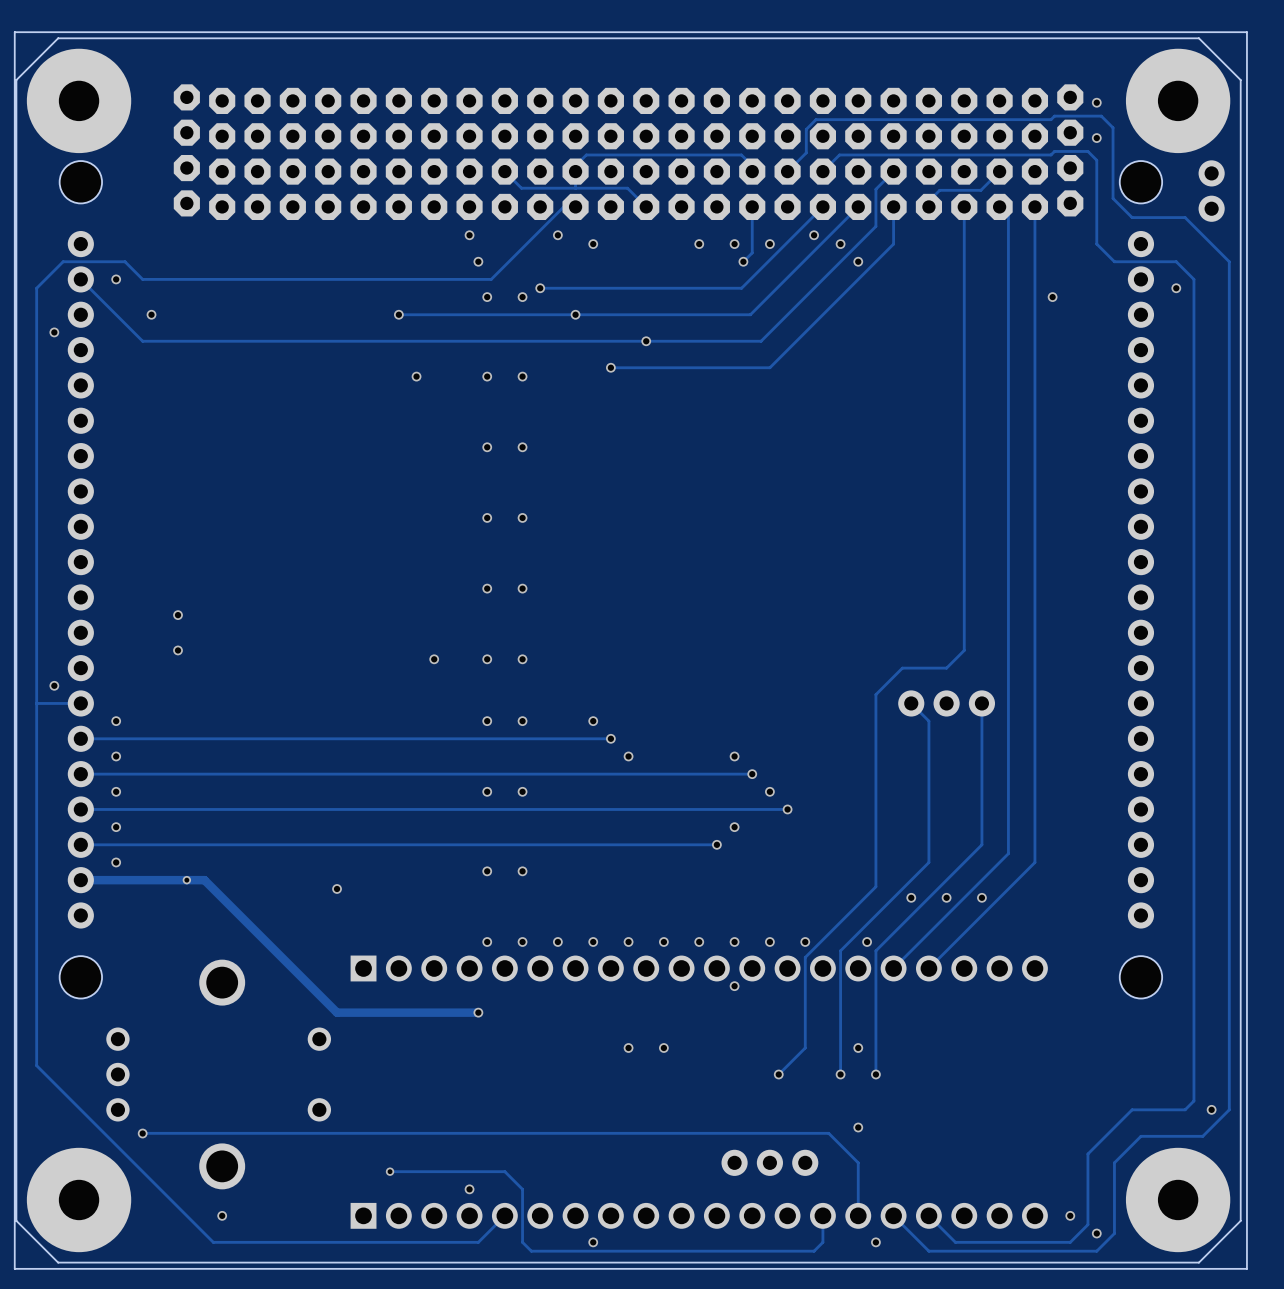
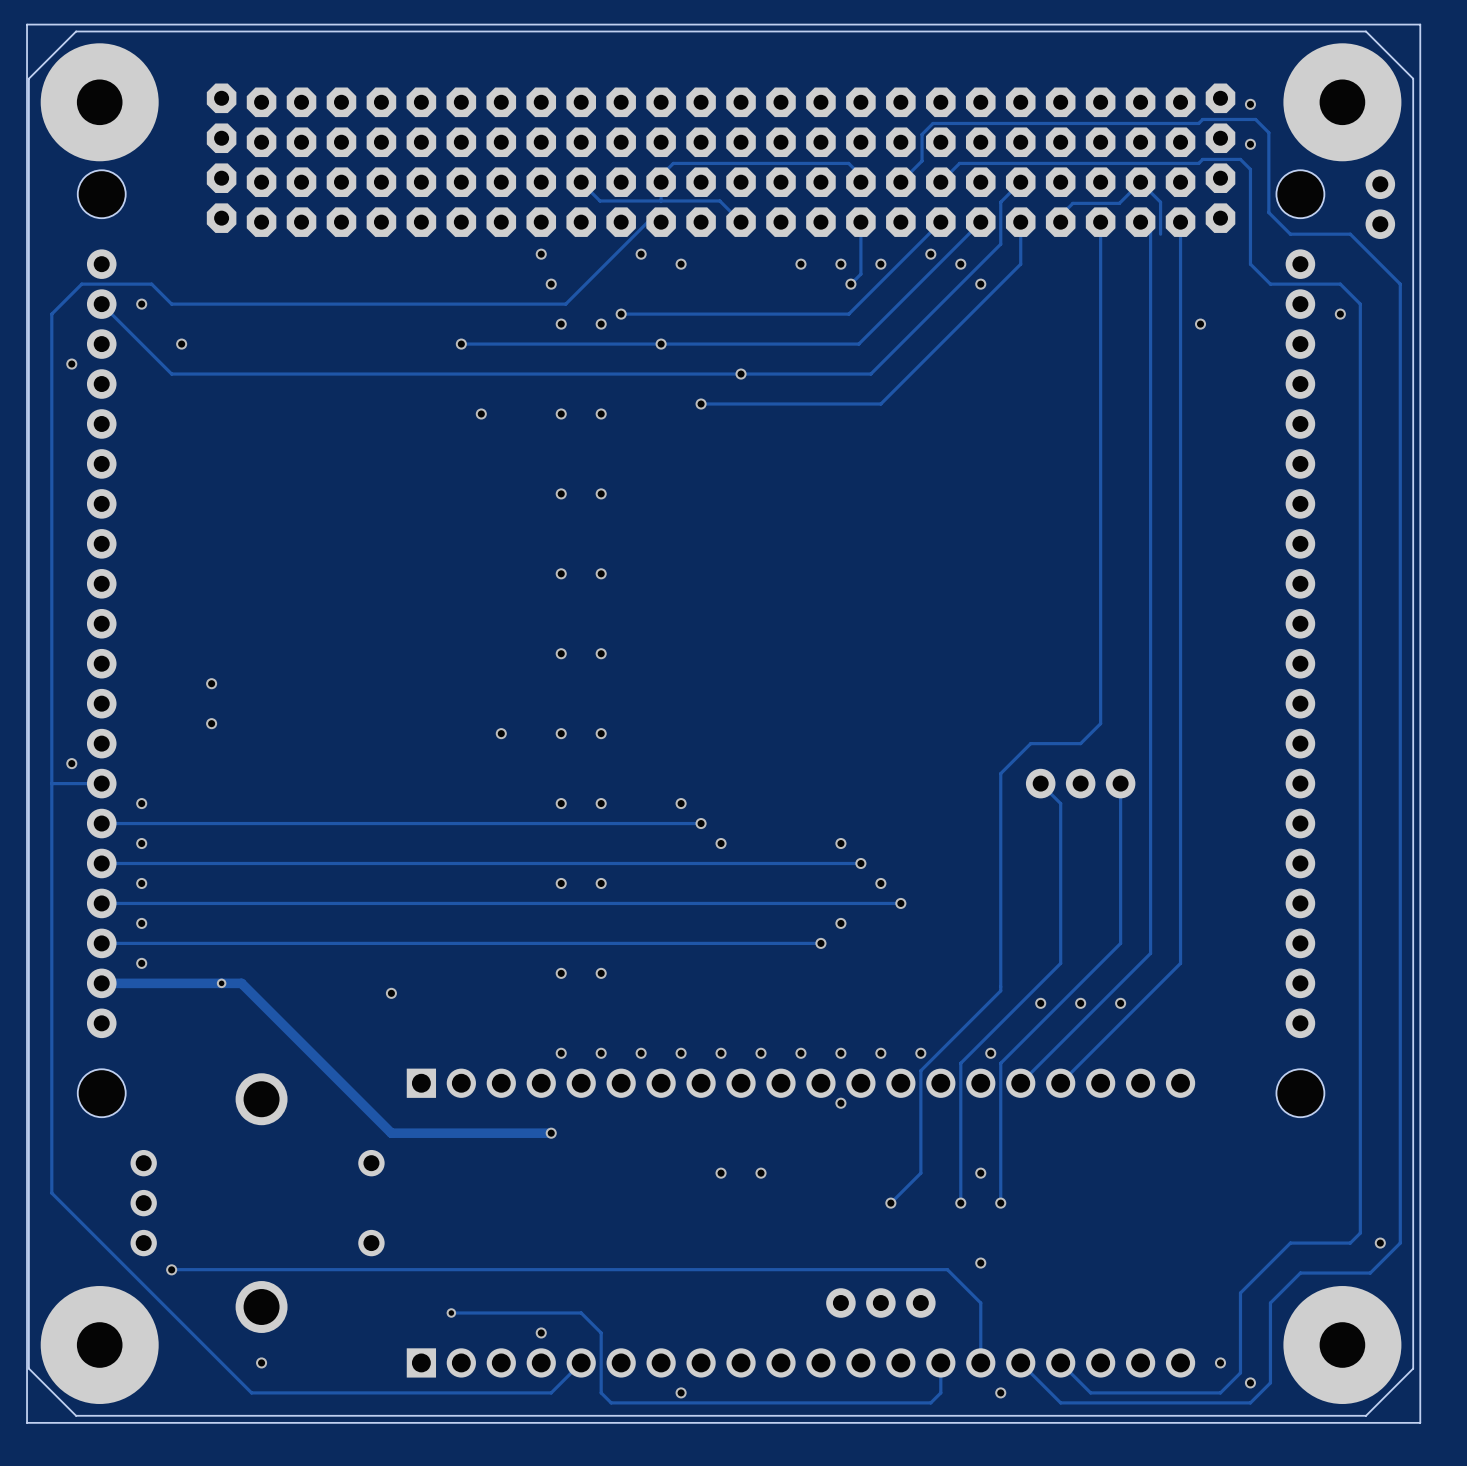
track: none -> (1140, 182) (1160, 202) (1160, 234)

